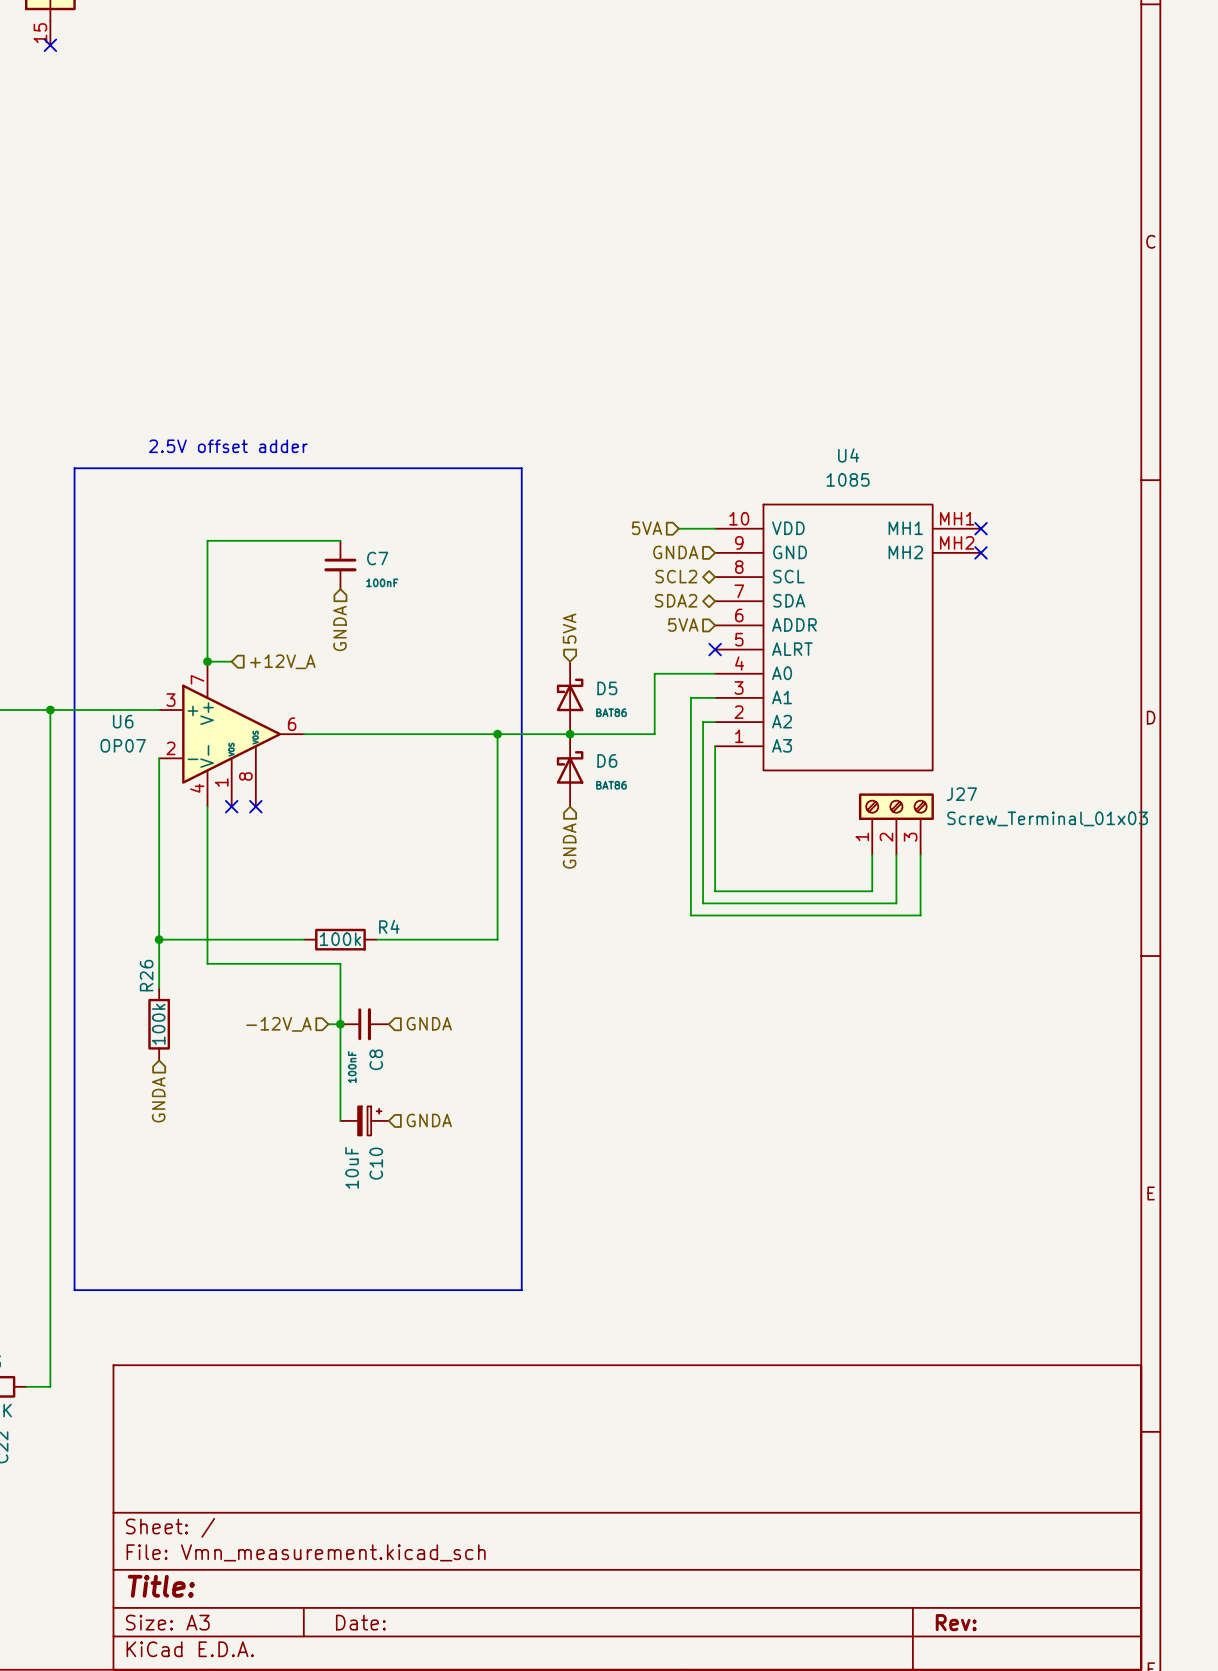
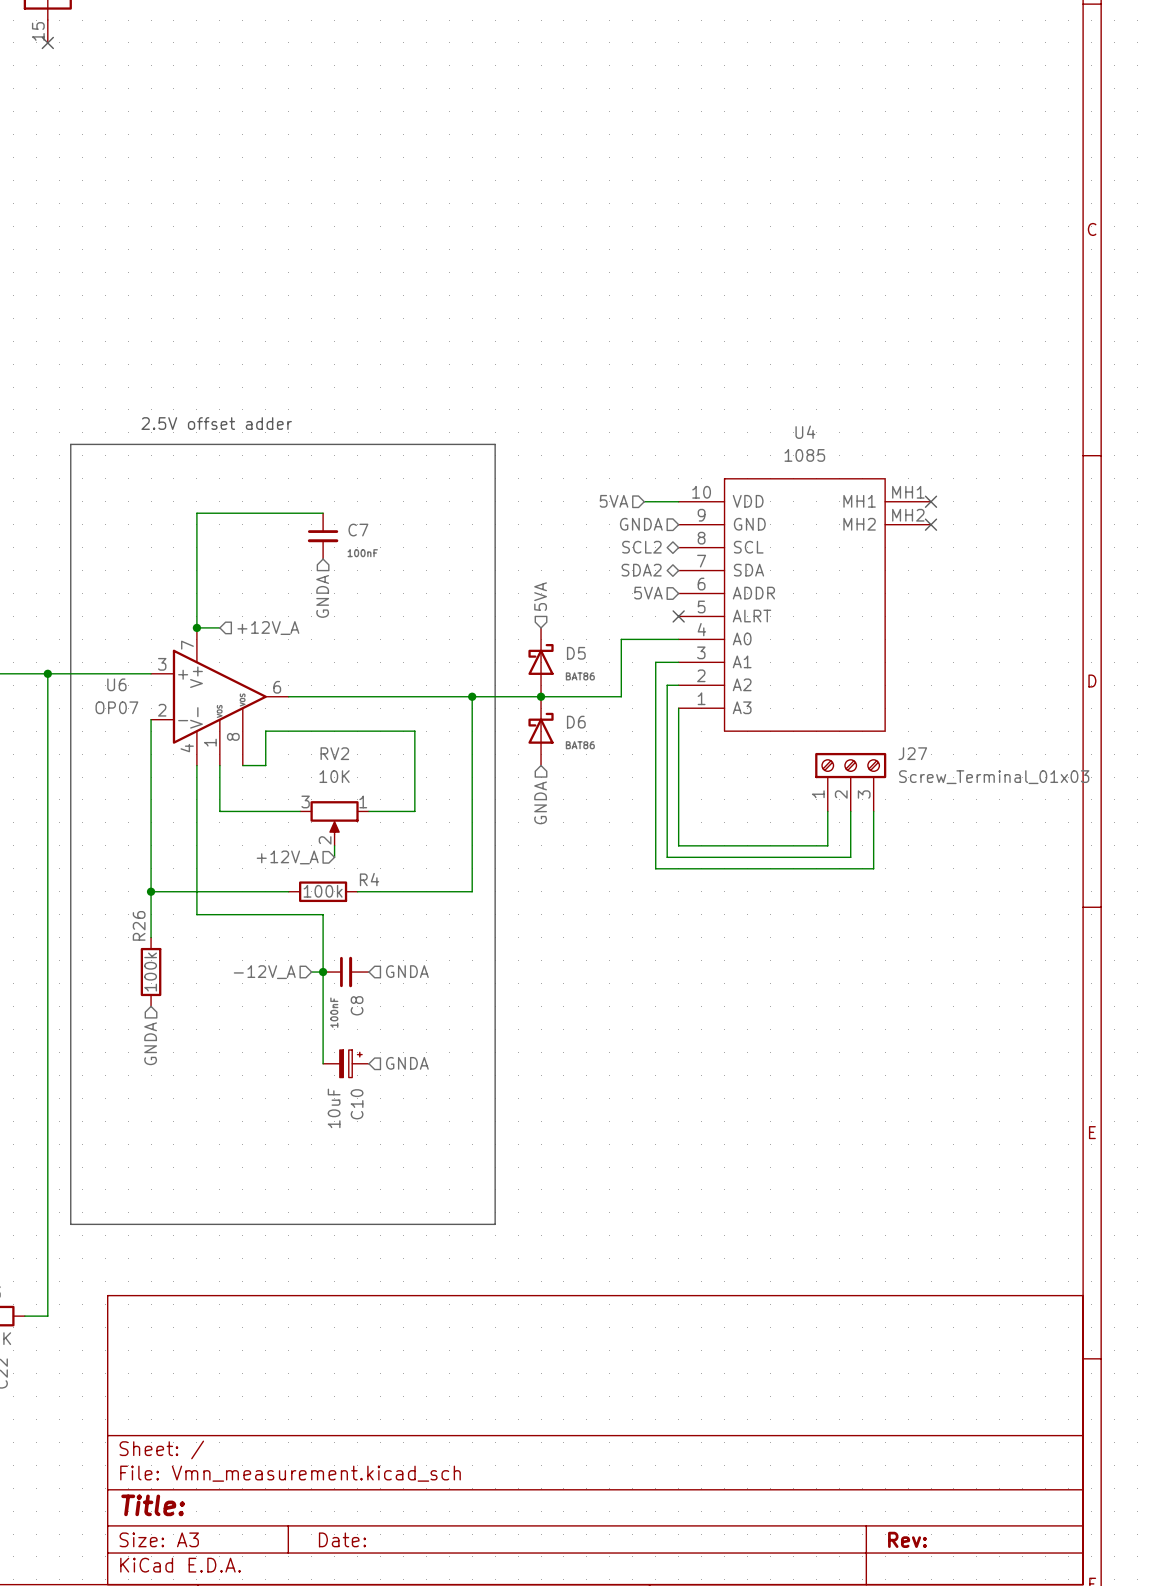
wire: none -> (219, 765) (219, 811) (300, 811)
no-connect mark: (231, 806) -> none
wire: none -> (242, 765) (265, 765) (265, 731) (414, 731) (414, 811) (368, 811)
no-connect mark: (255, 806) -> none
RV2: none -> 10K (334, 823)
wire: none -> (334, 845) (334, 857)
hierarchical label: none -> +12V_A (287, 857)

